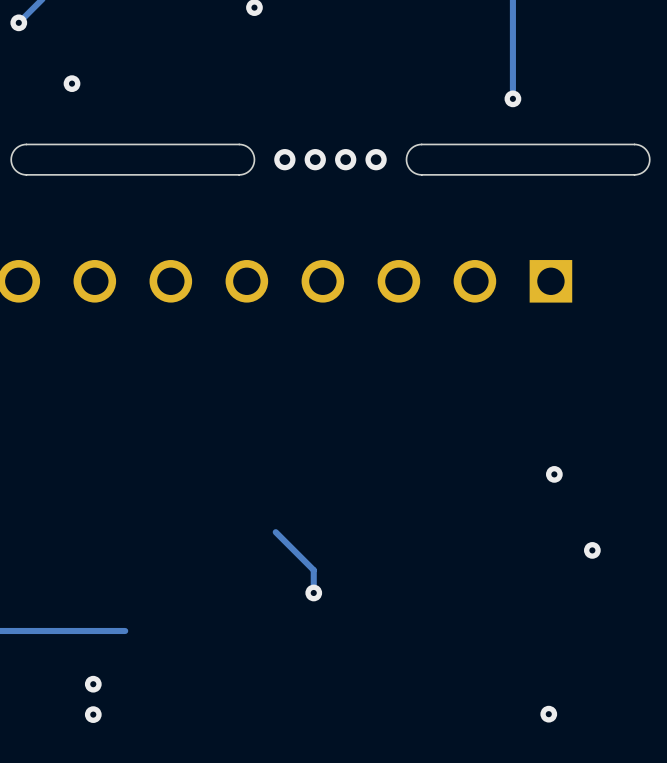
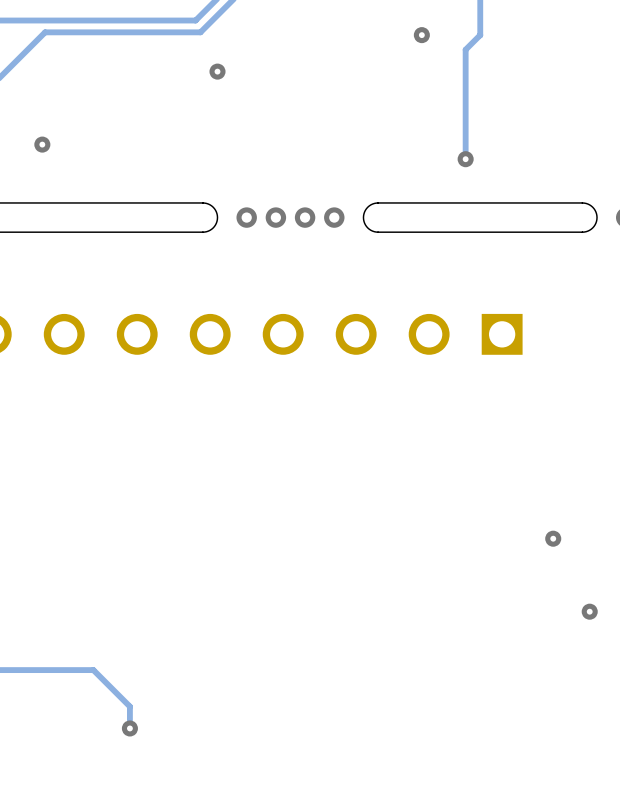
via: (554, 474) -> none
via: none -> (553, 538)
track: (275, 532) (313, 570) (313, 592) -> (93, 670) (129, 706) (129, 728)
via: (592, 550) -> none
via: none -> (589, 611)
via: (313, 592) -> none
via: (93, 684) -> none
via: none -> (129, 728)
via: (93, 714) -> none
via: (548, 714) -> none

